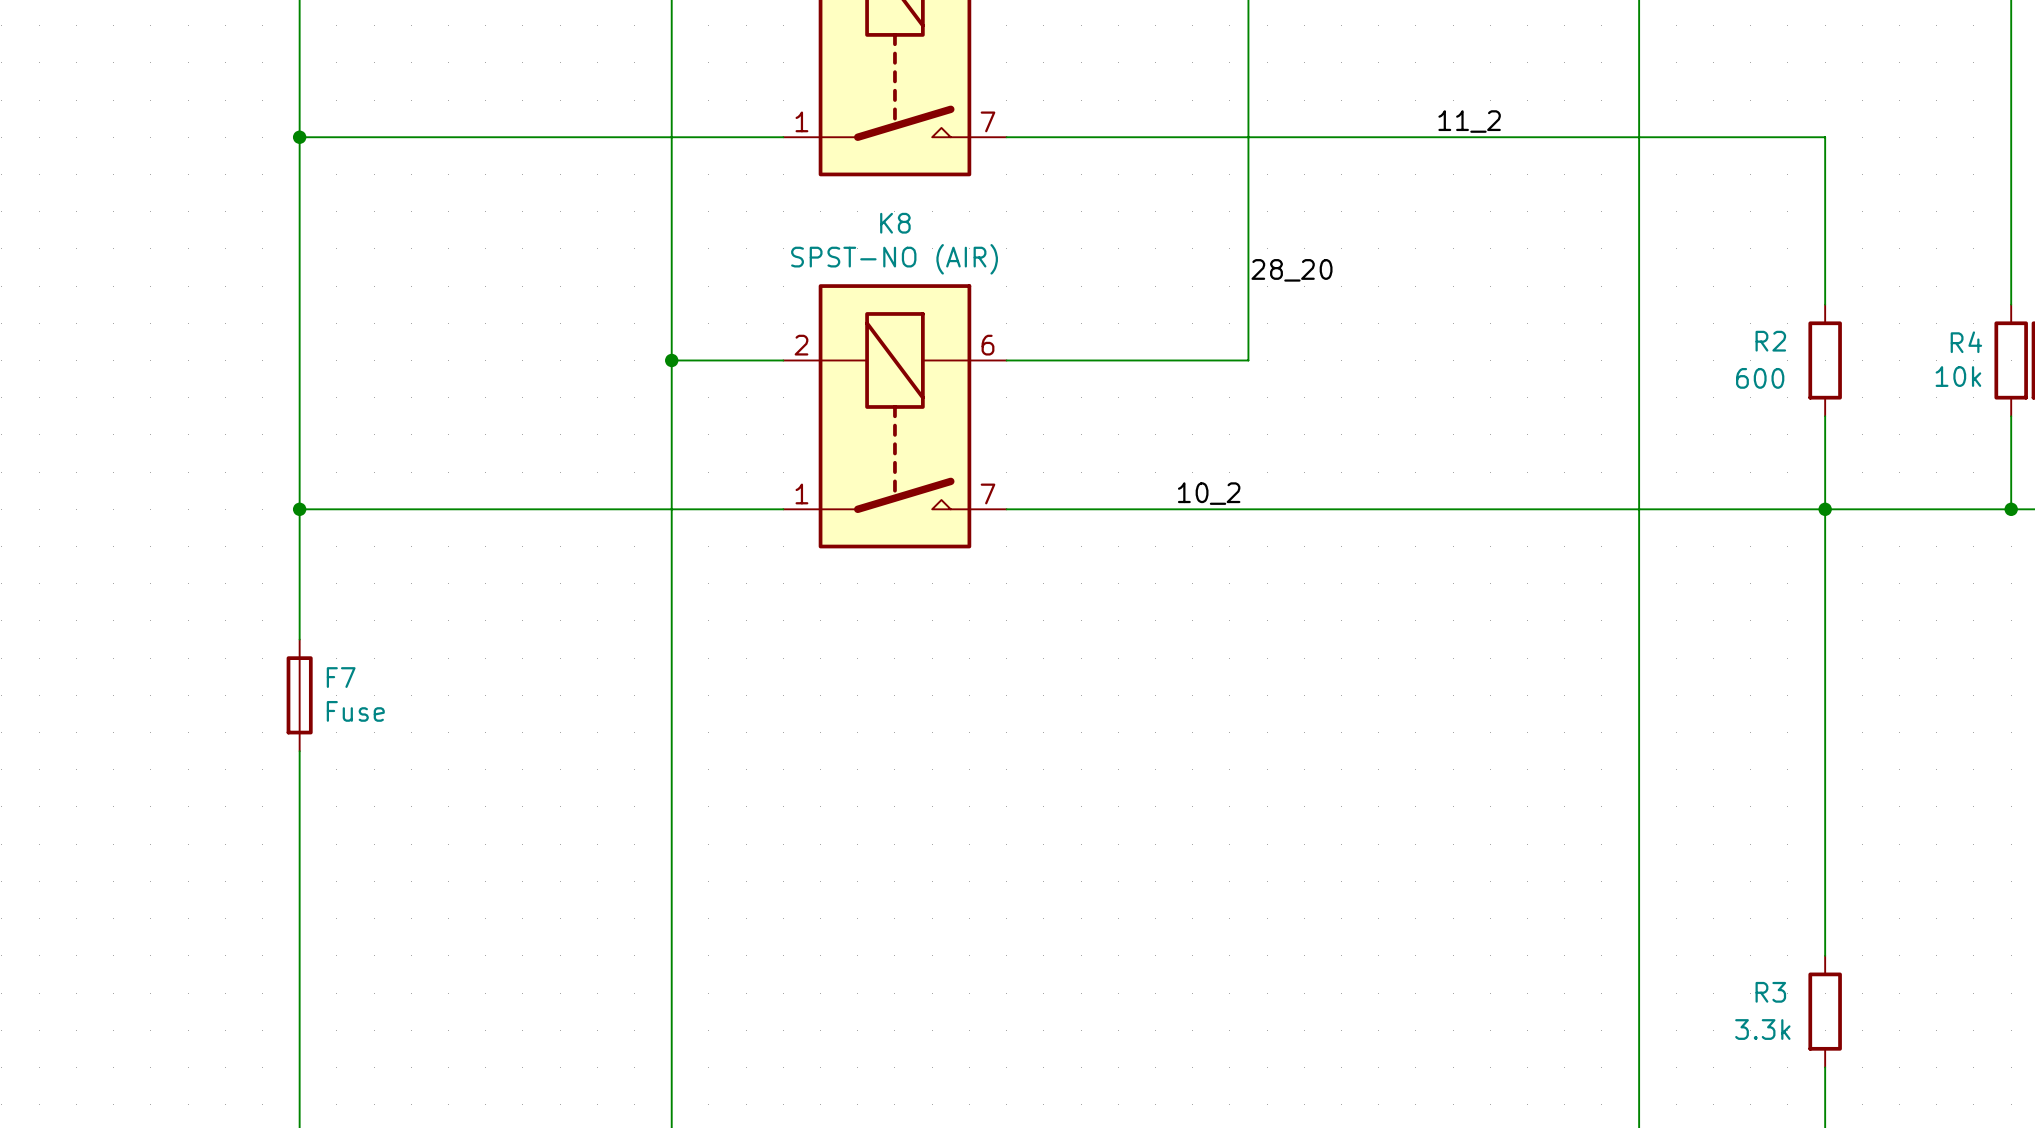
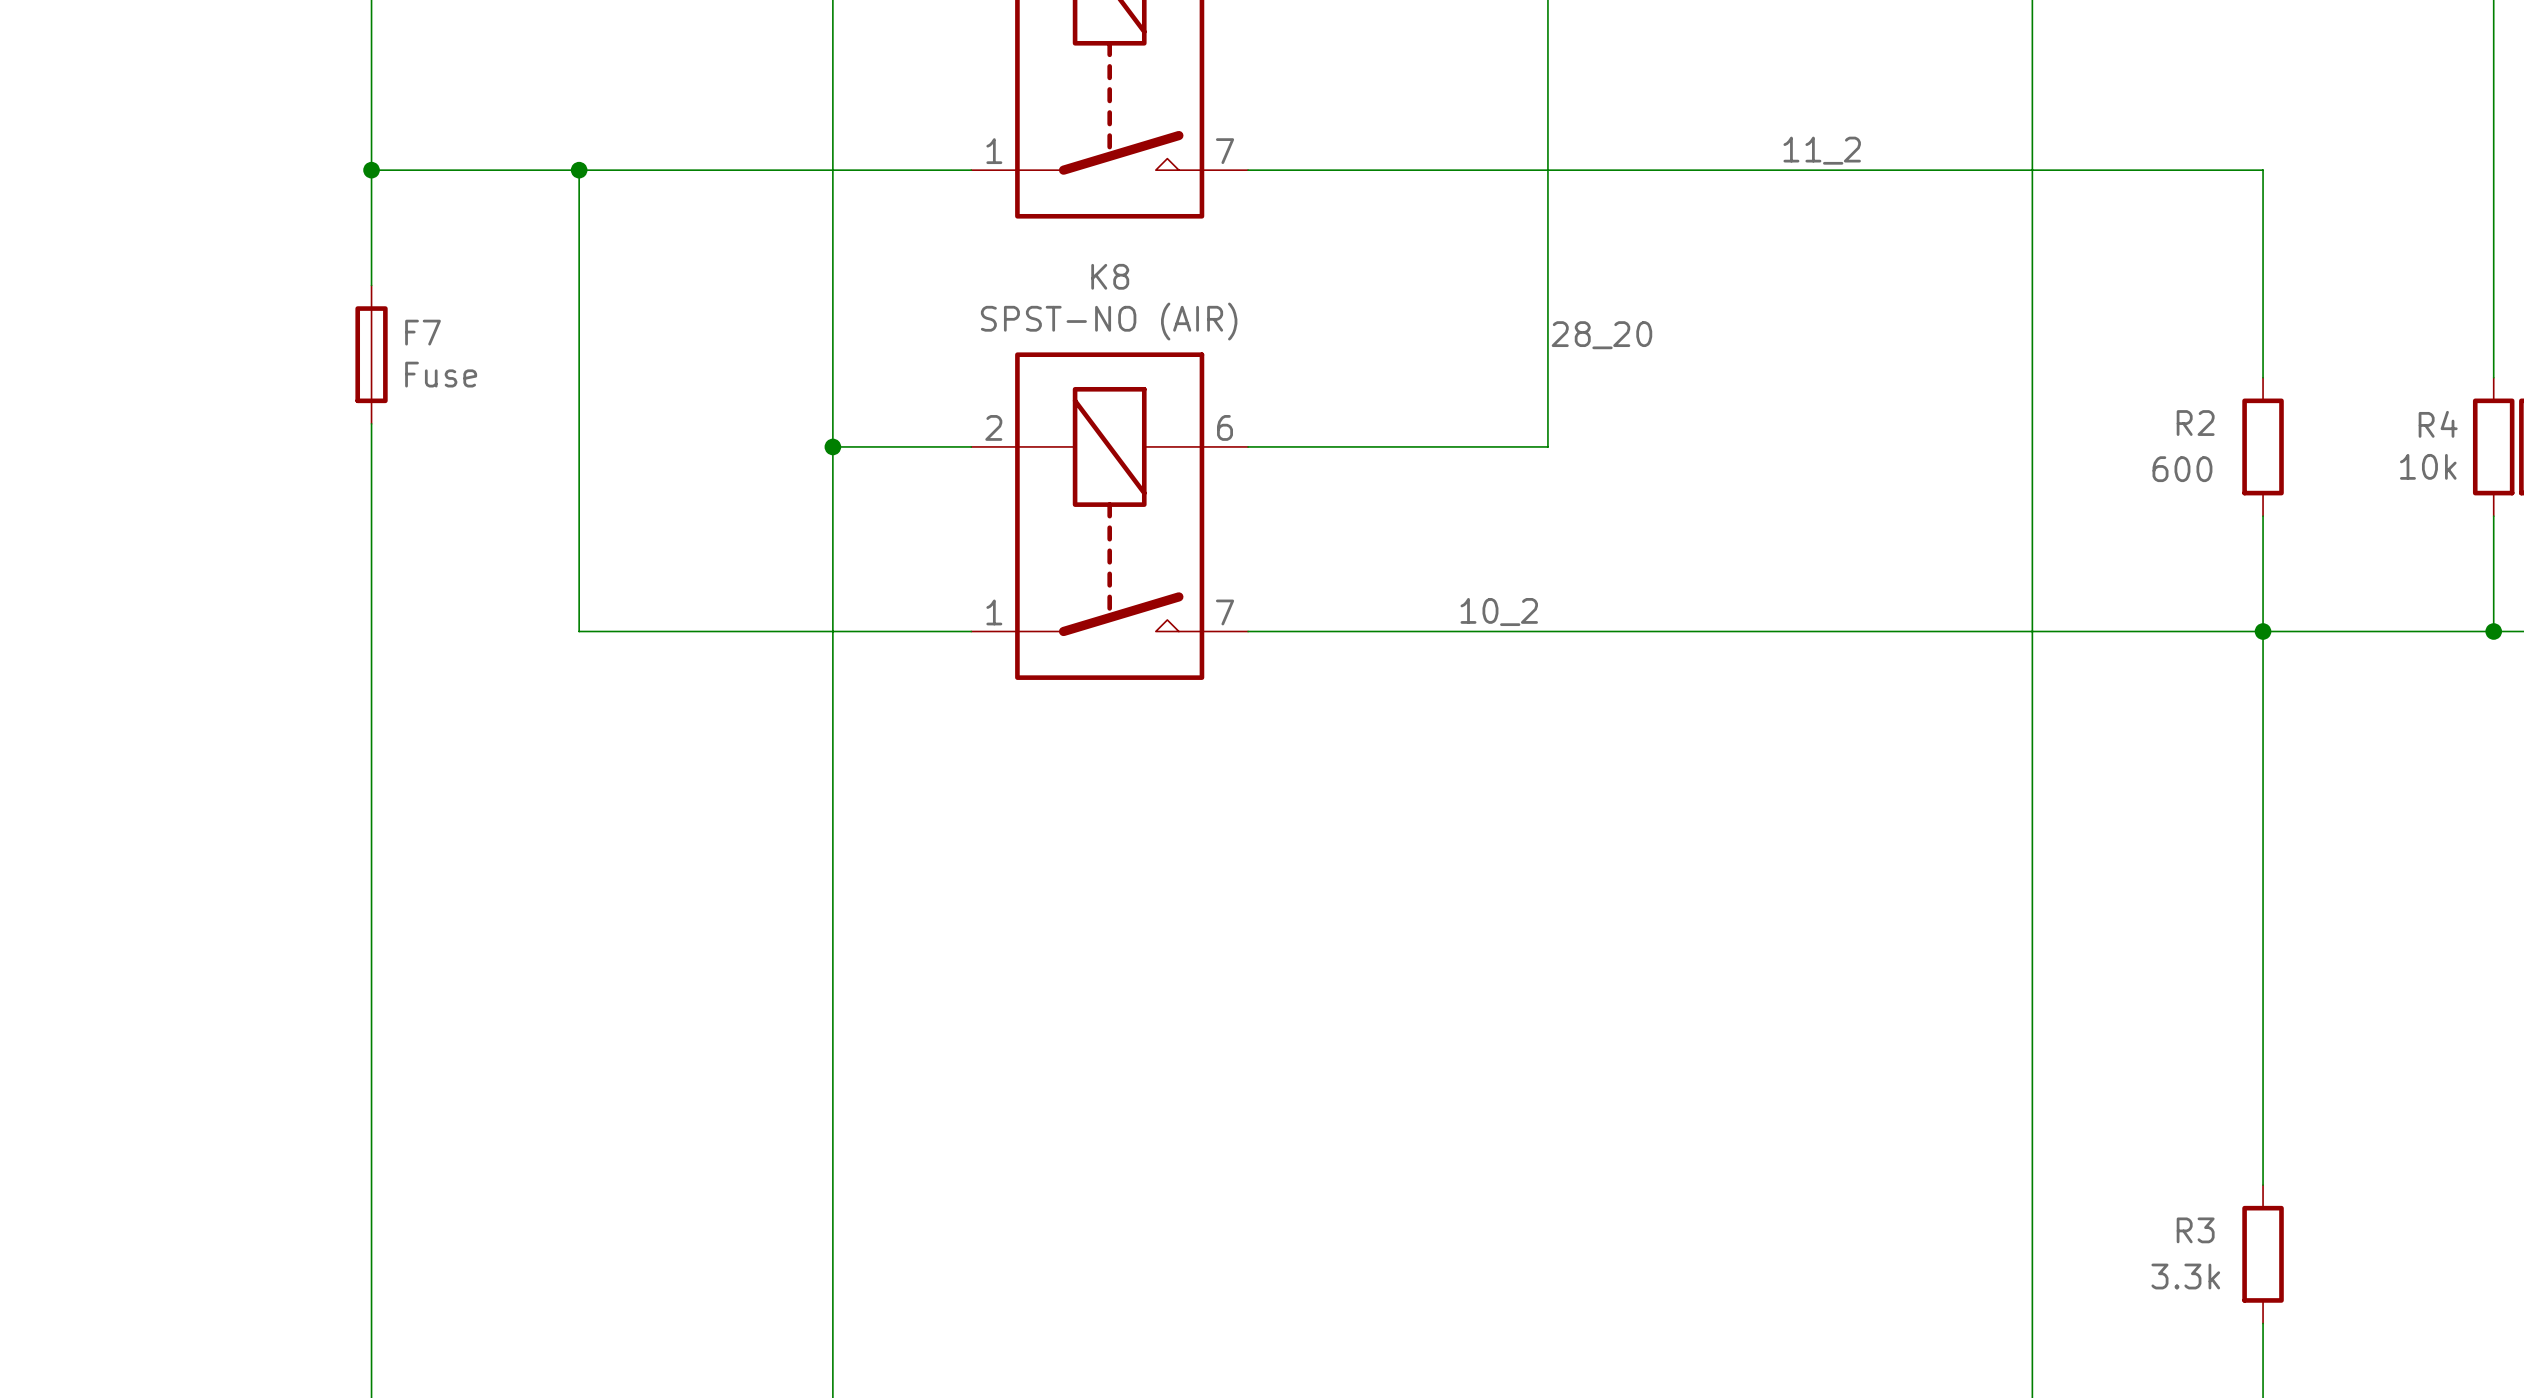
junction: none -> (579, 170)
wire: (299, 509) (467, 509) -> (579, 170) (579, 631)
junction: (299, 509) -> none
F7 position: (299, 695) -> (371, 354)

